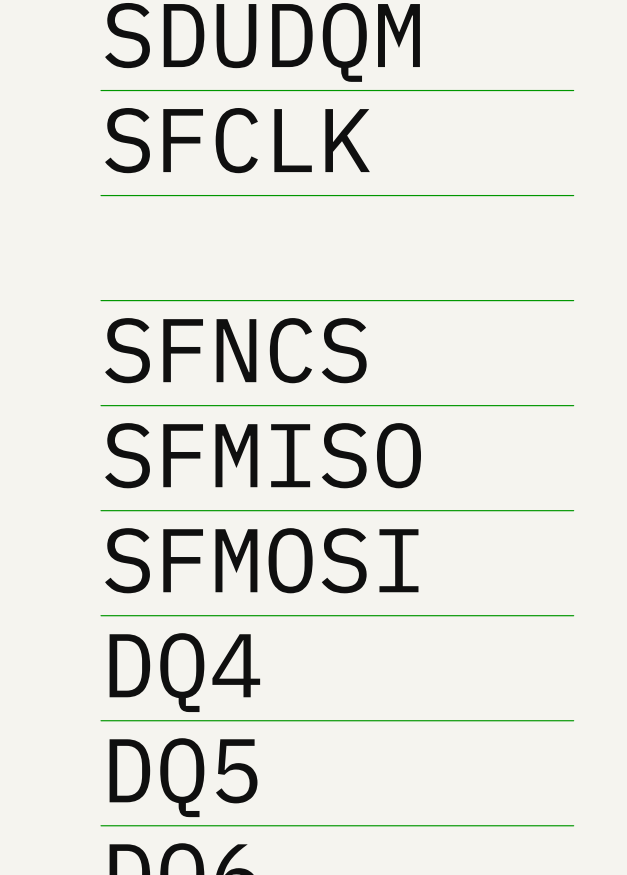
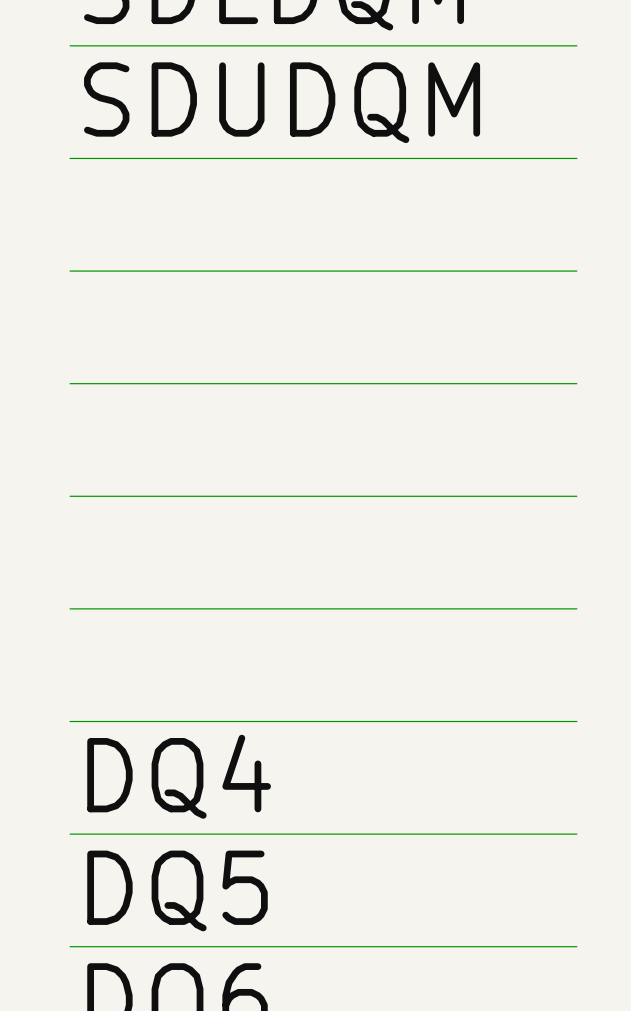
label: SFCLK (237, 140) -> none
label: SFNCS (235, 350) -> none
label: SFMISO (263, 455) -> none
label: SFMOSI (261, 560) -> none

